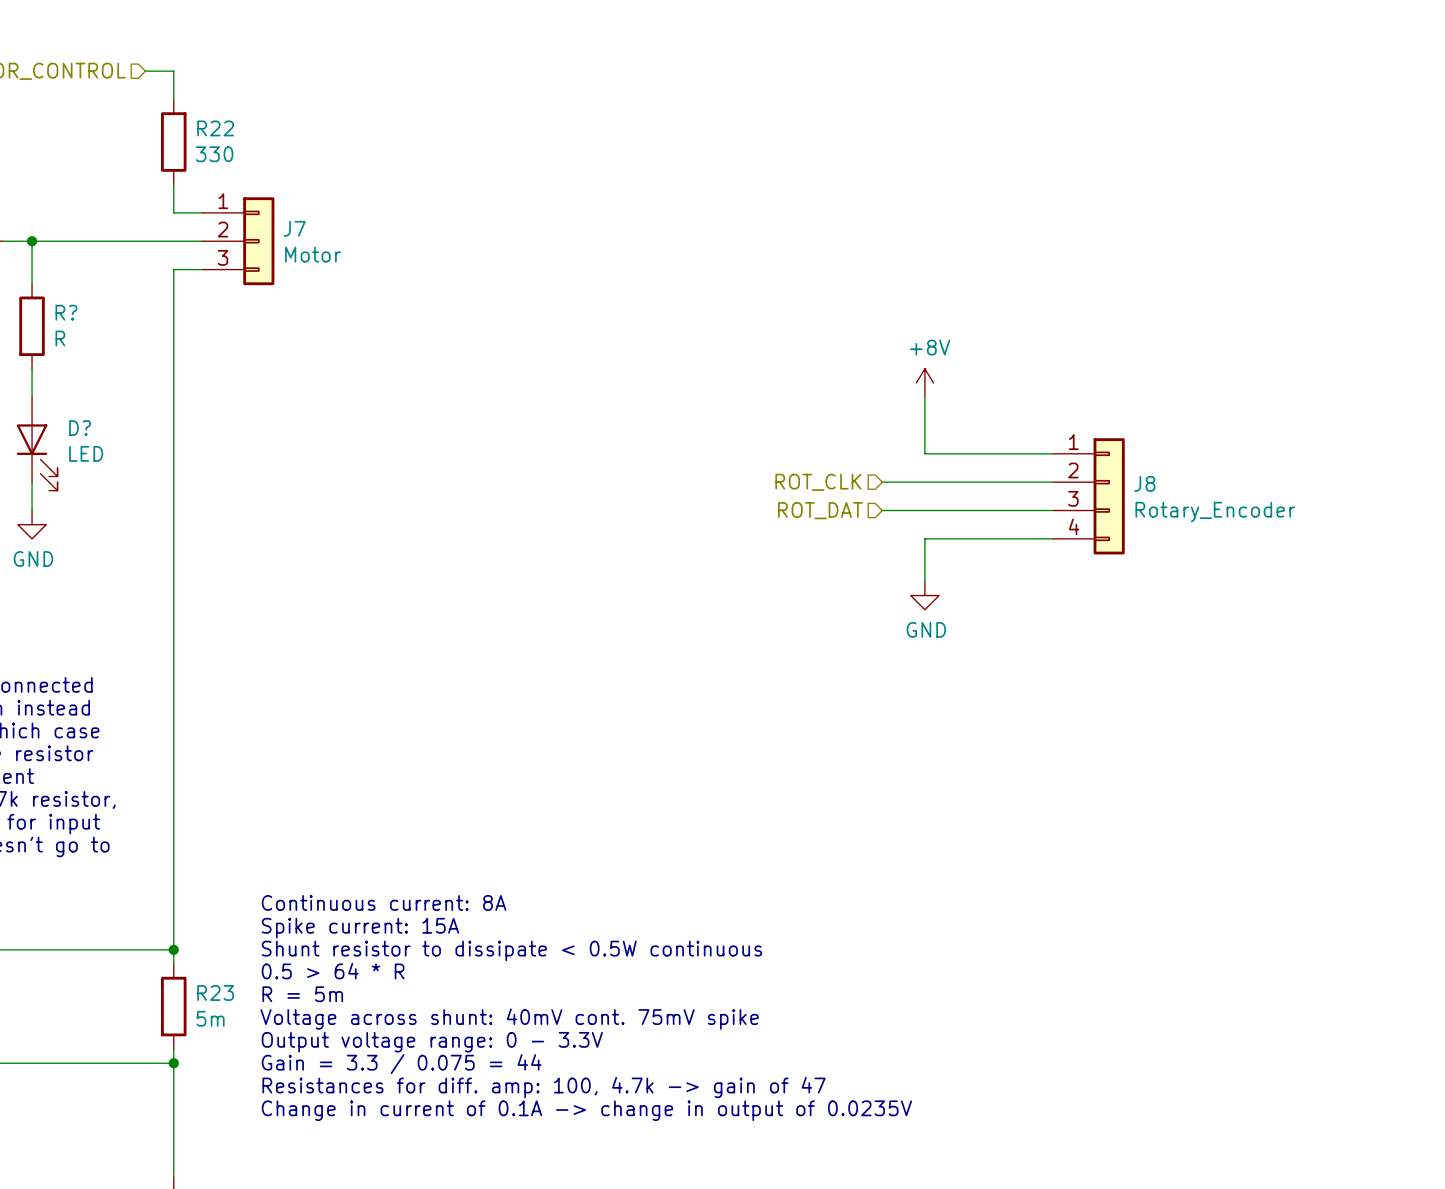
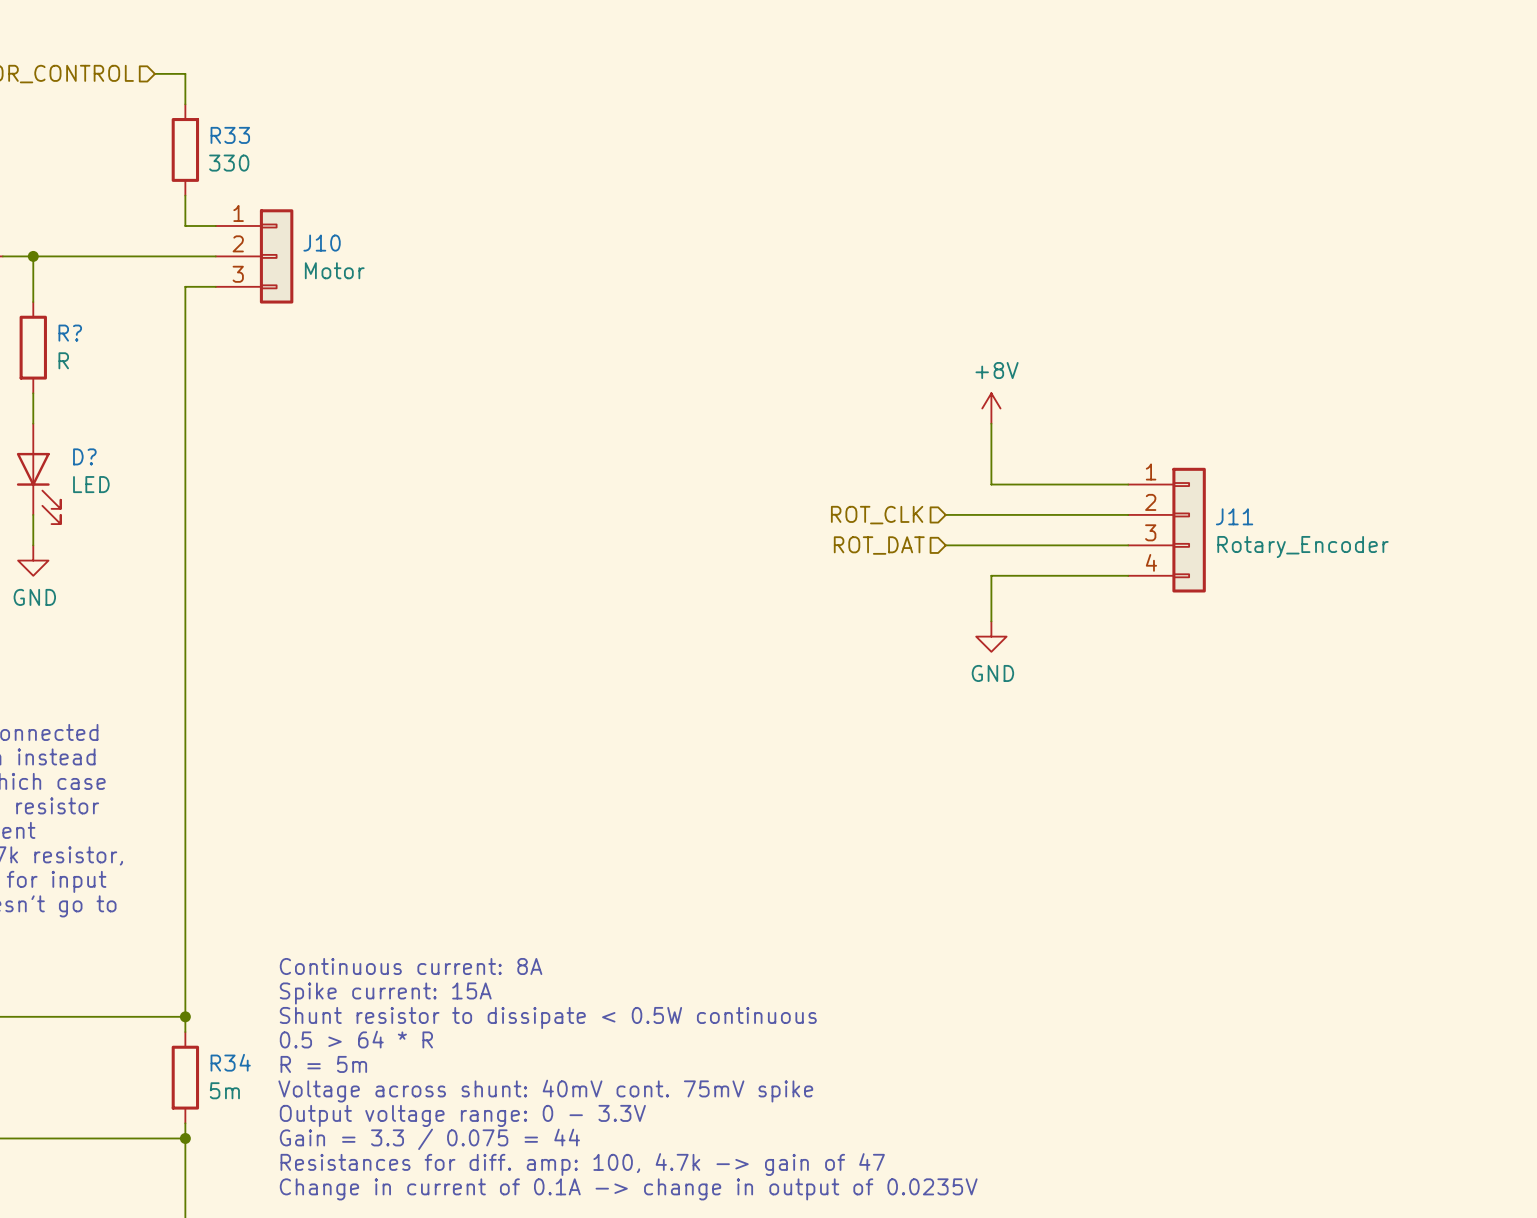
R22 name: R22 (215, 128) -> R33 (230, 135)
J7 name: J7 (294, 228) -> J10 (322, 243)
J8 name: J8 (1144, 483) -> J11 (1234, 516)
R23 name: R23 (215, 992) -> R34 (230, 1062)

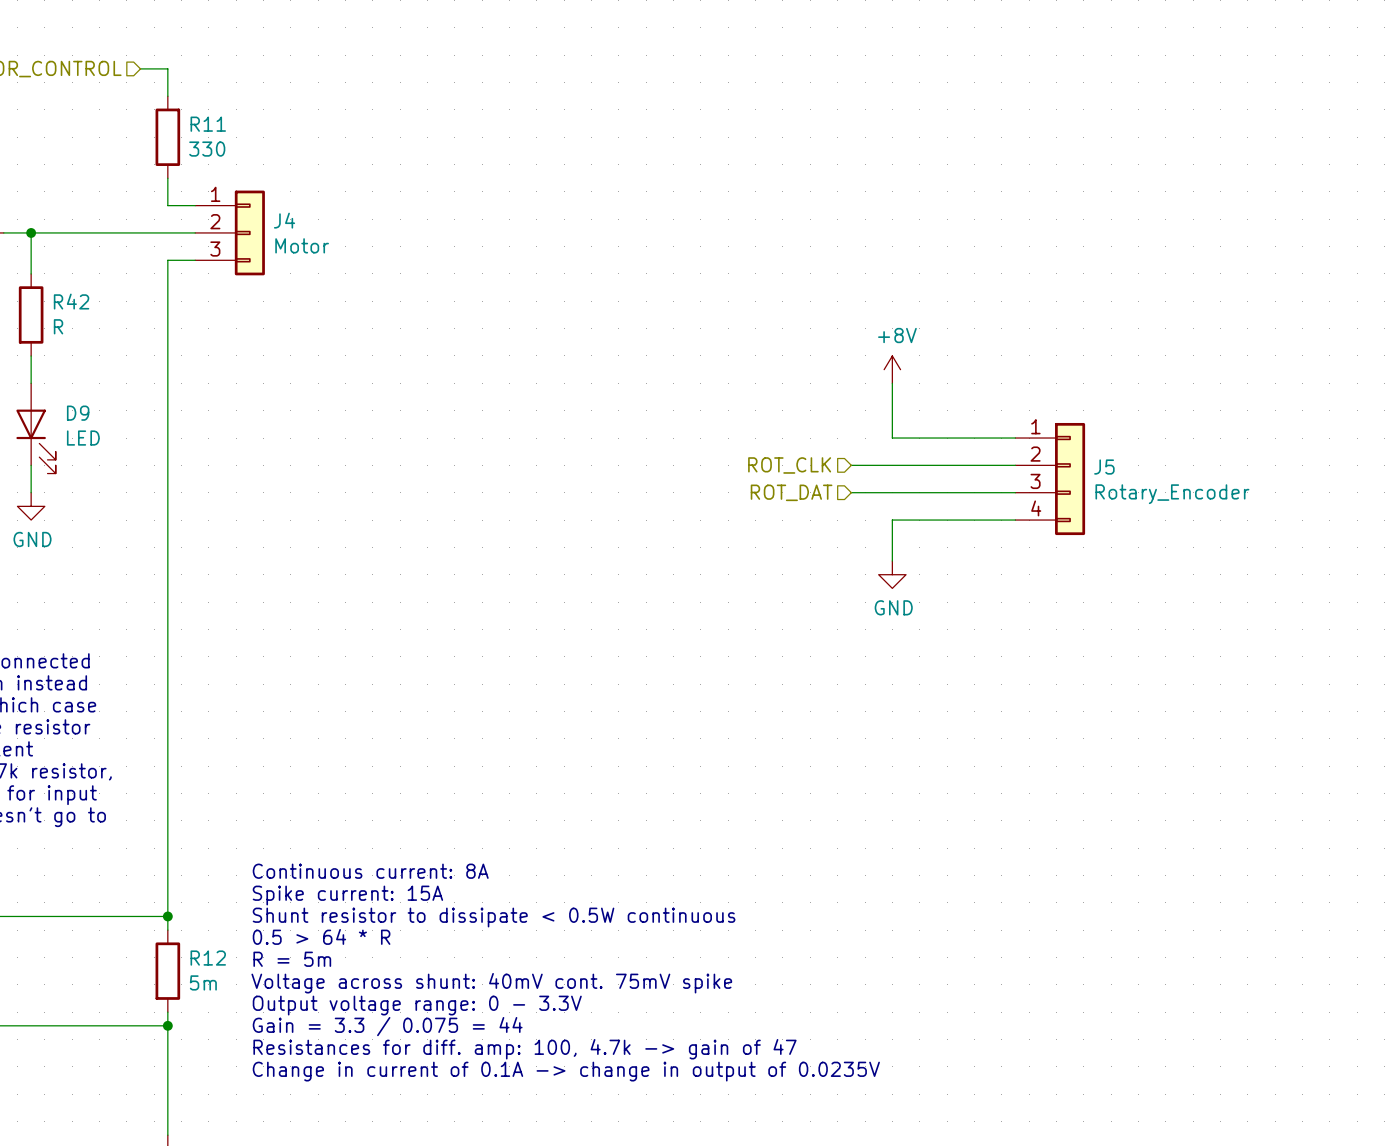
R33 name: R33 (230, 135) -> R11 (208, 124)
J10 name: J10 (322, 243) -> J4 (284, 220)
R? name: R? (70, 333) -> R42 (71, 301)
D? name: D? (84, 456) -> D9 (78, 413)
J11 name: J11 (1234, 516) -> J5 (1104, 467)
R34 name: R34 (230, 1062) -> R12 (208, 958)

